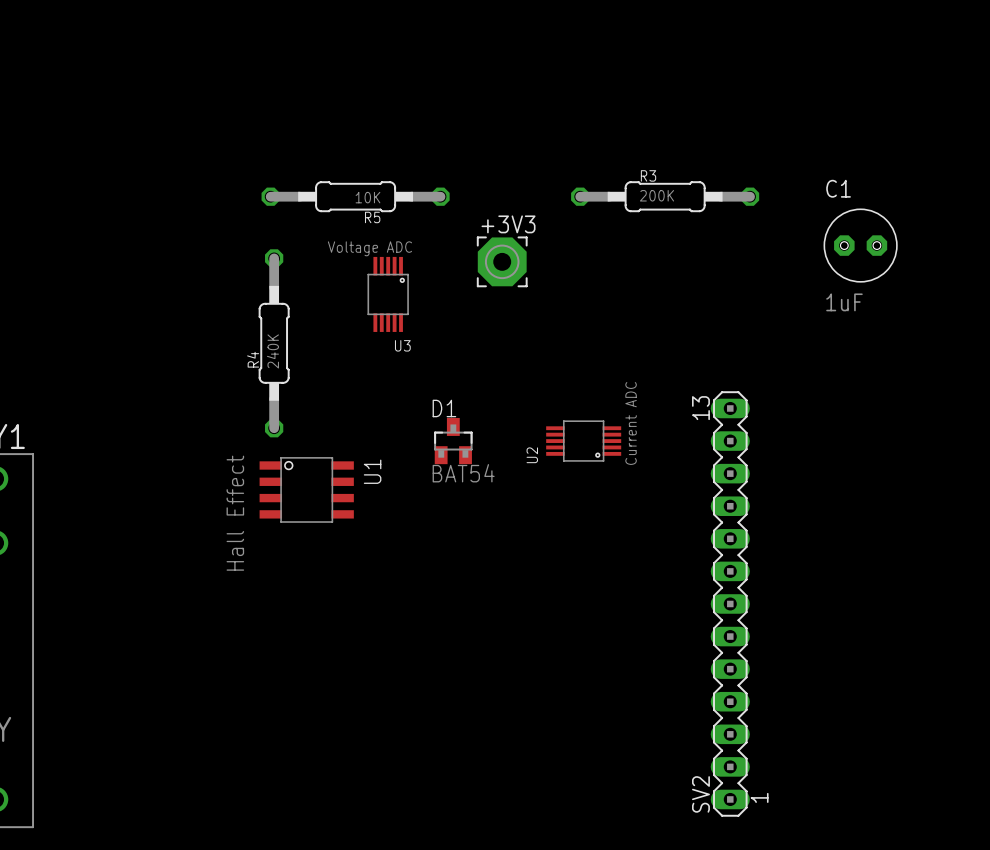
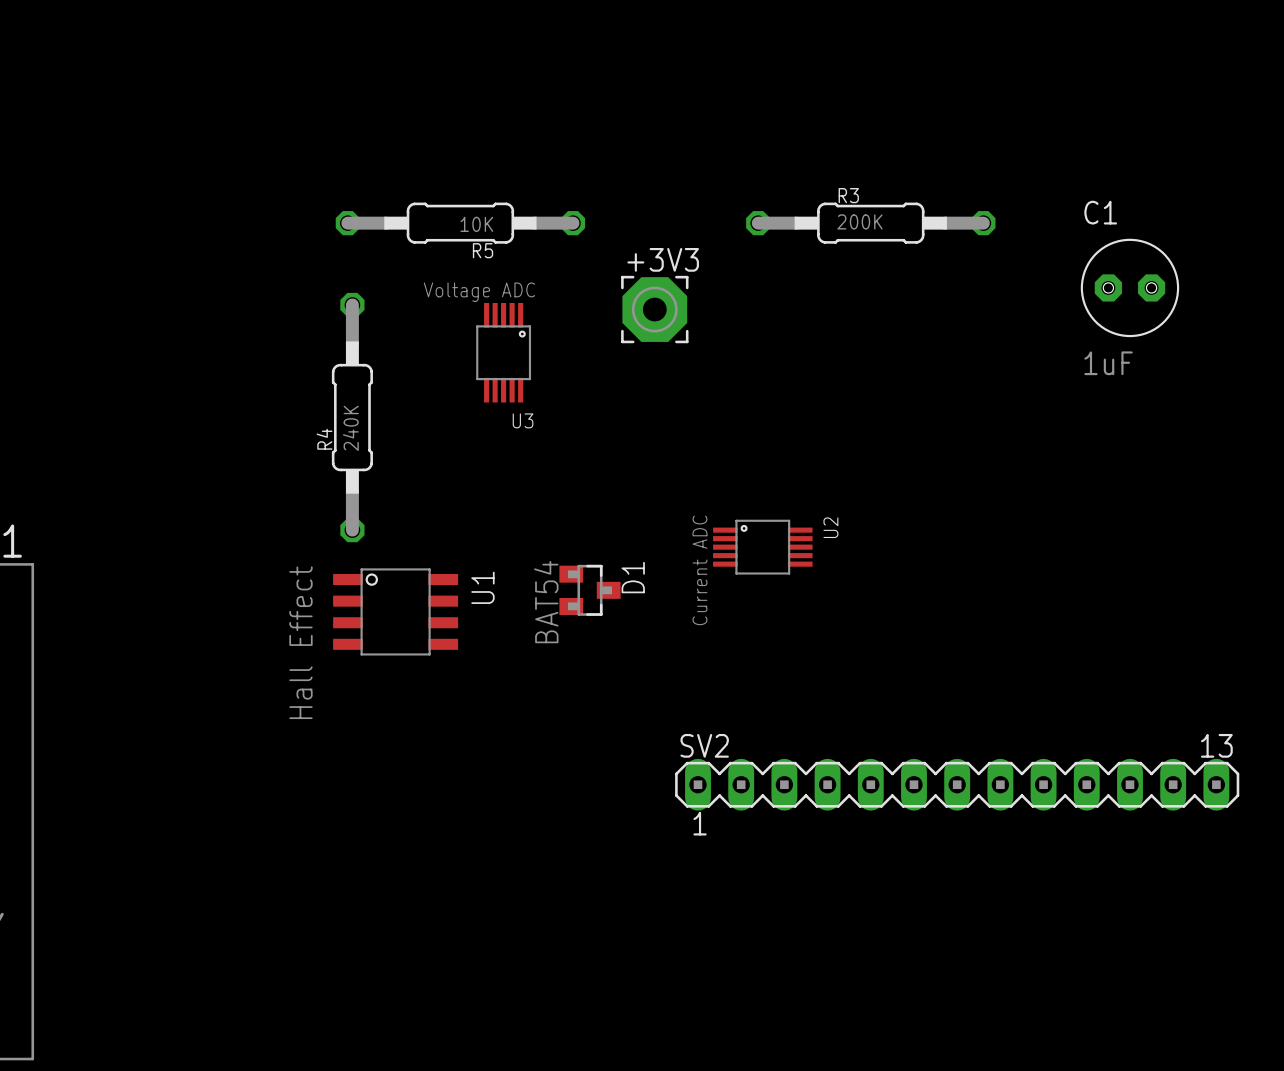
D1 rotation: 0° (453, 441) -> 90° clockwise (590, 590)
D1 position: (453, 441) -> (590, 590)
U2 rotation: 0° (583, 441) -> 180° (762, 547)
SV2 rotation: 0° (730, 603) -> 90° clockwise (957, 784)

